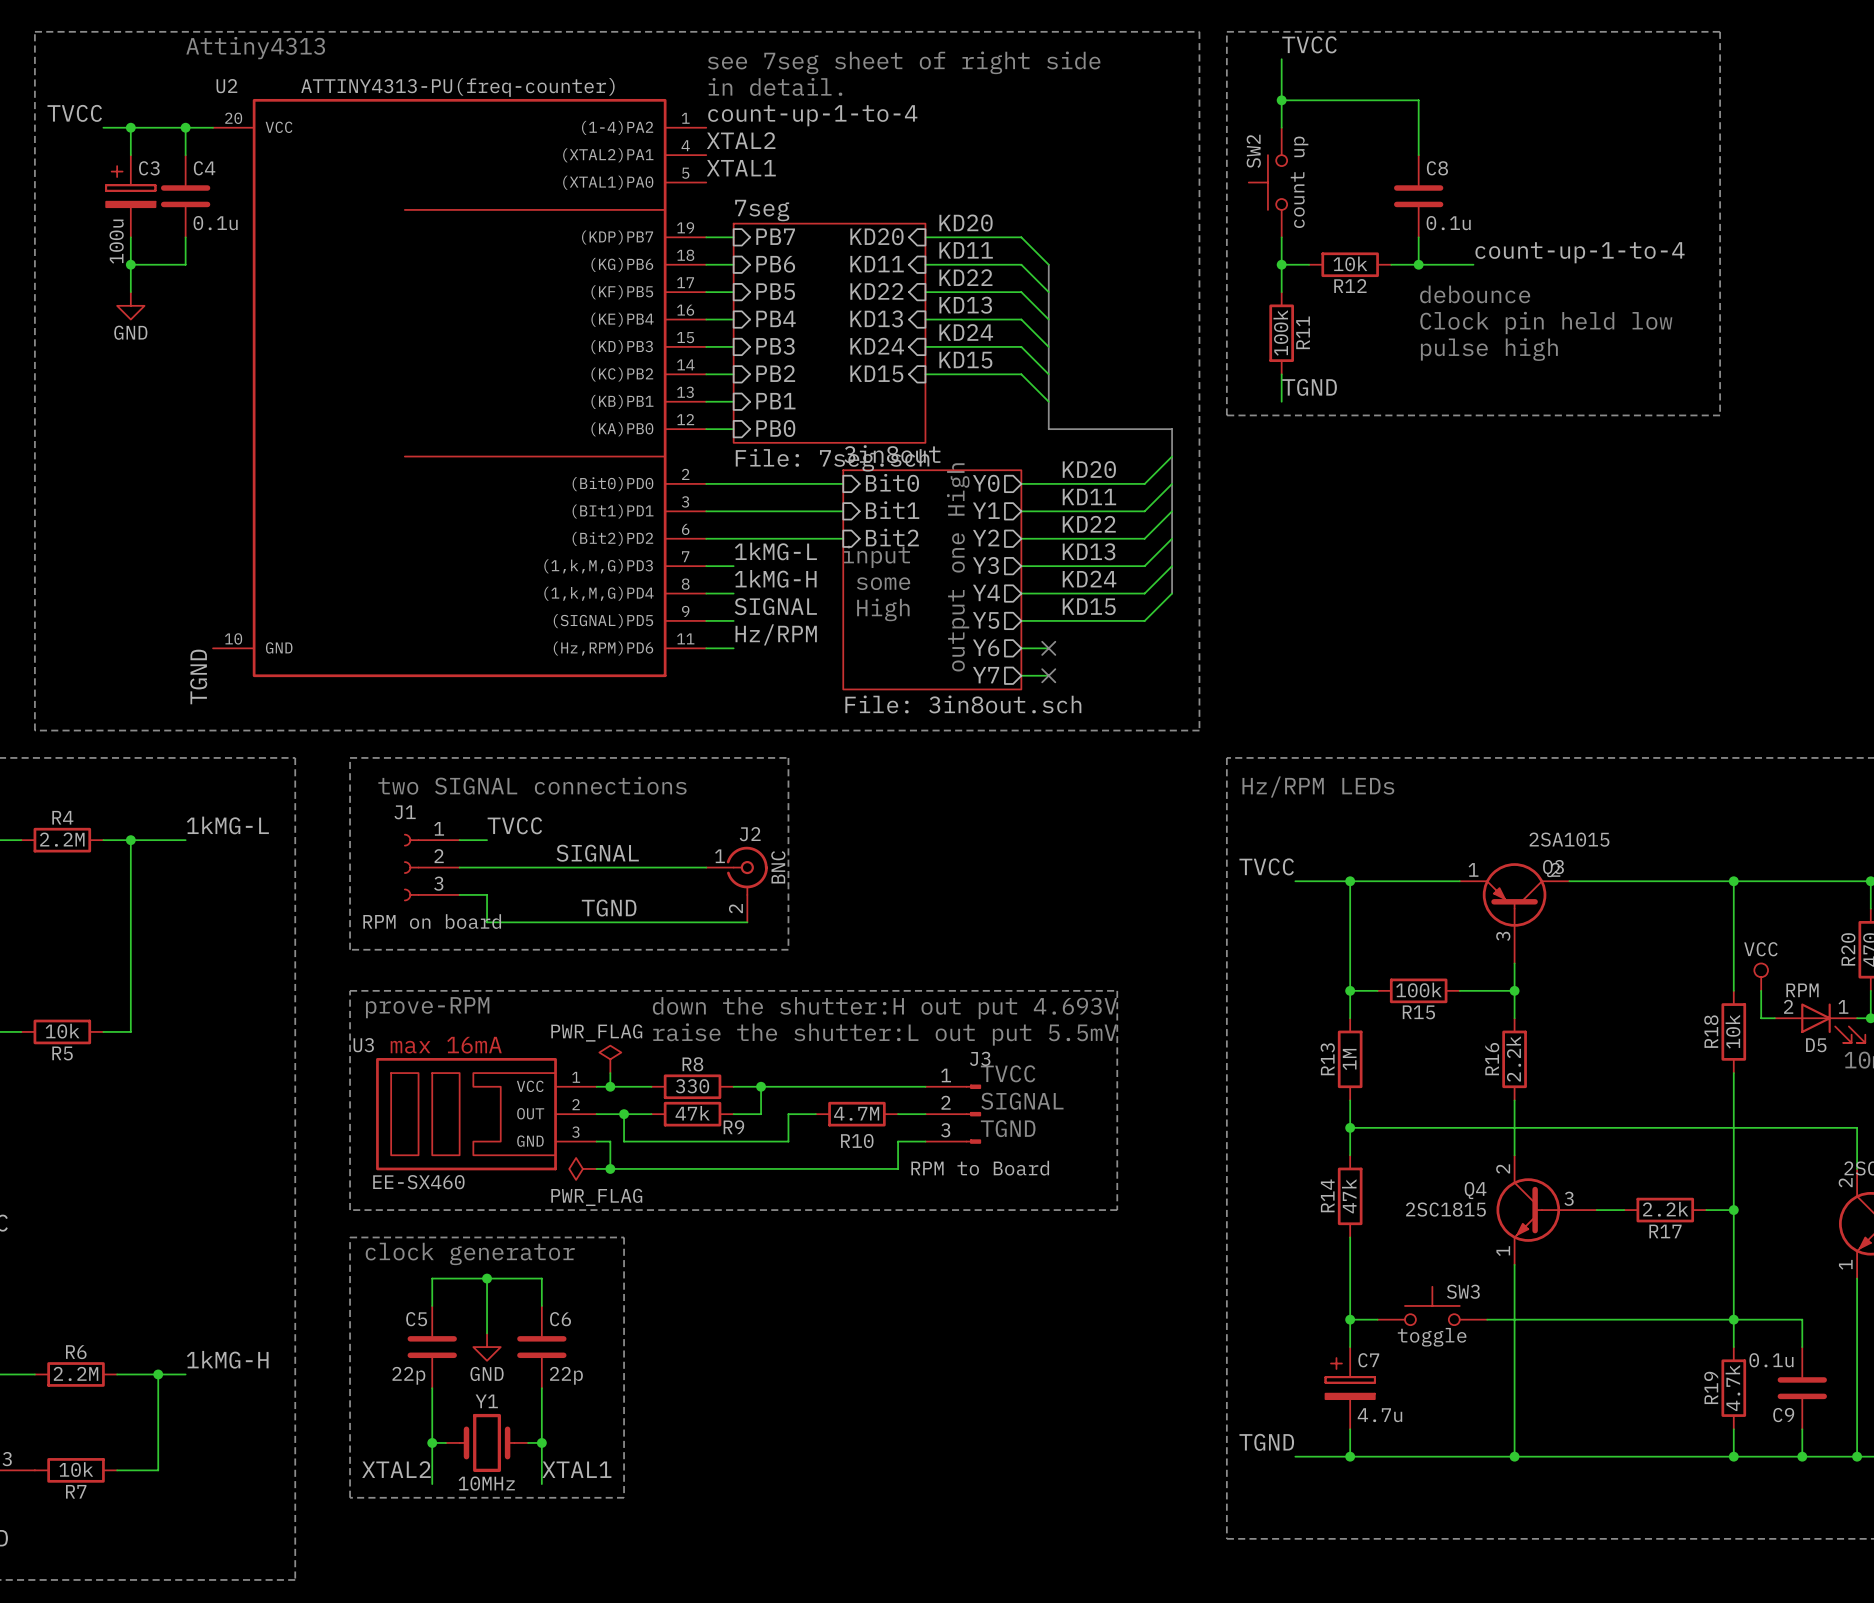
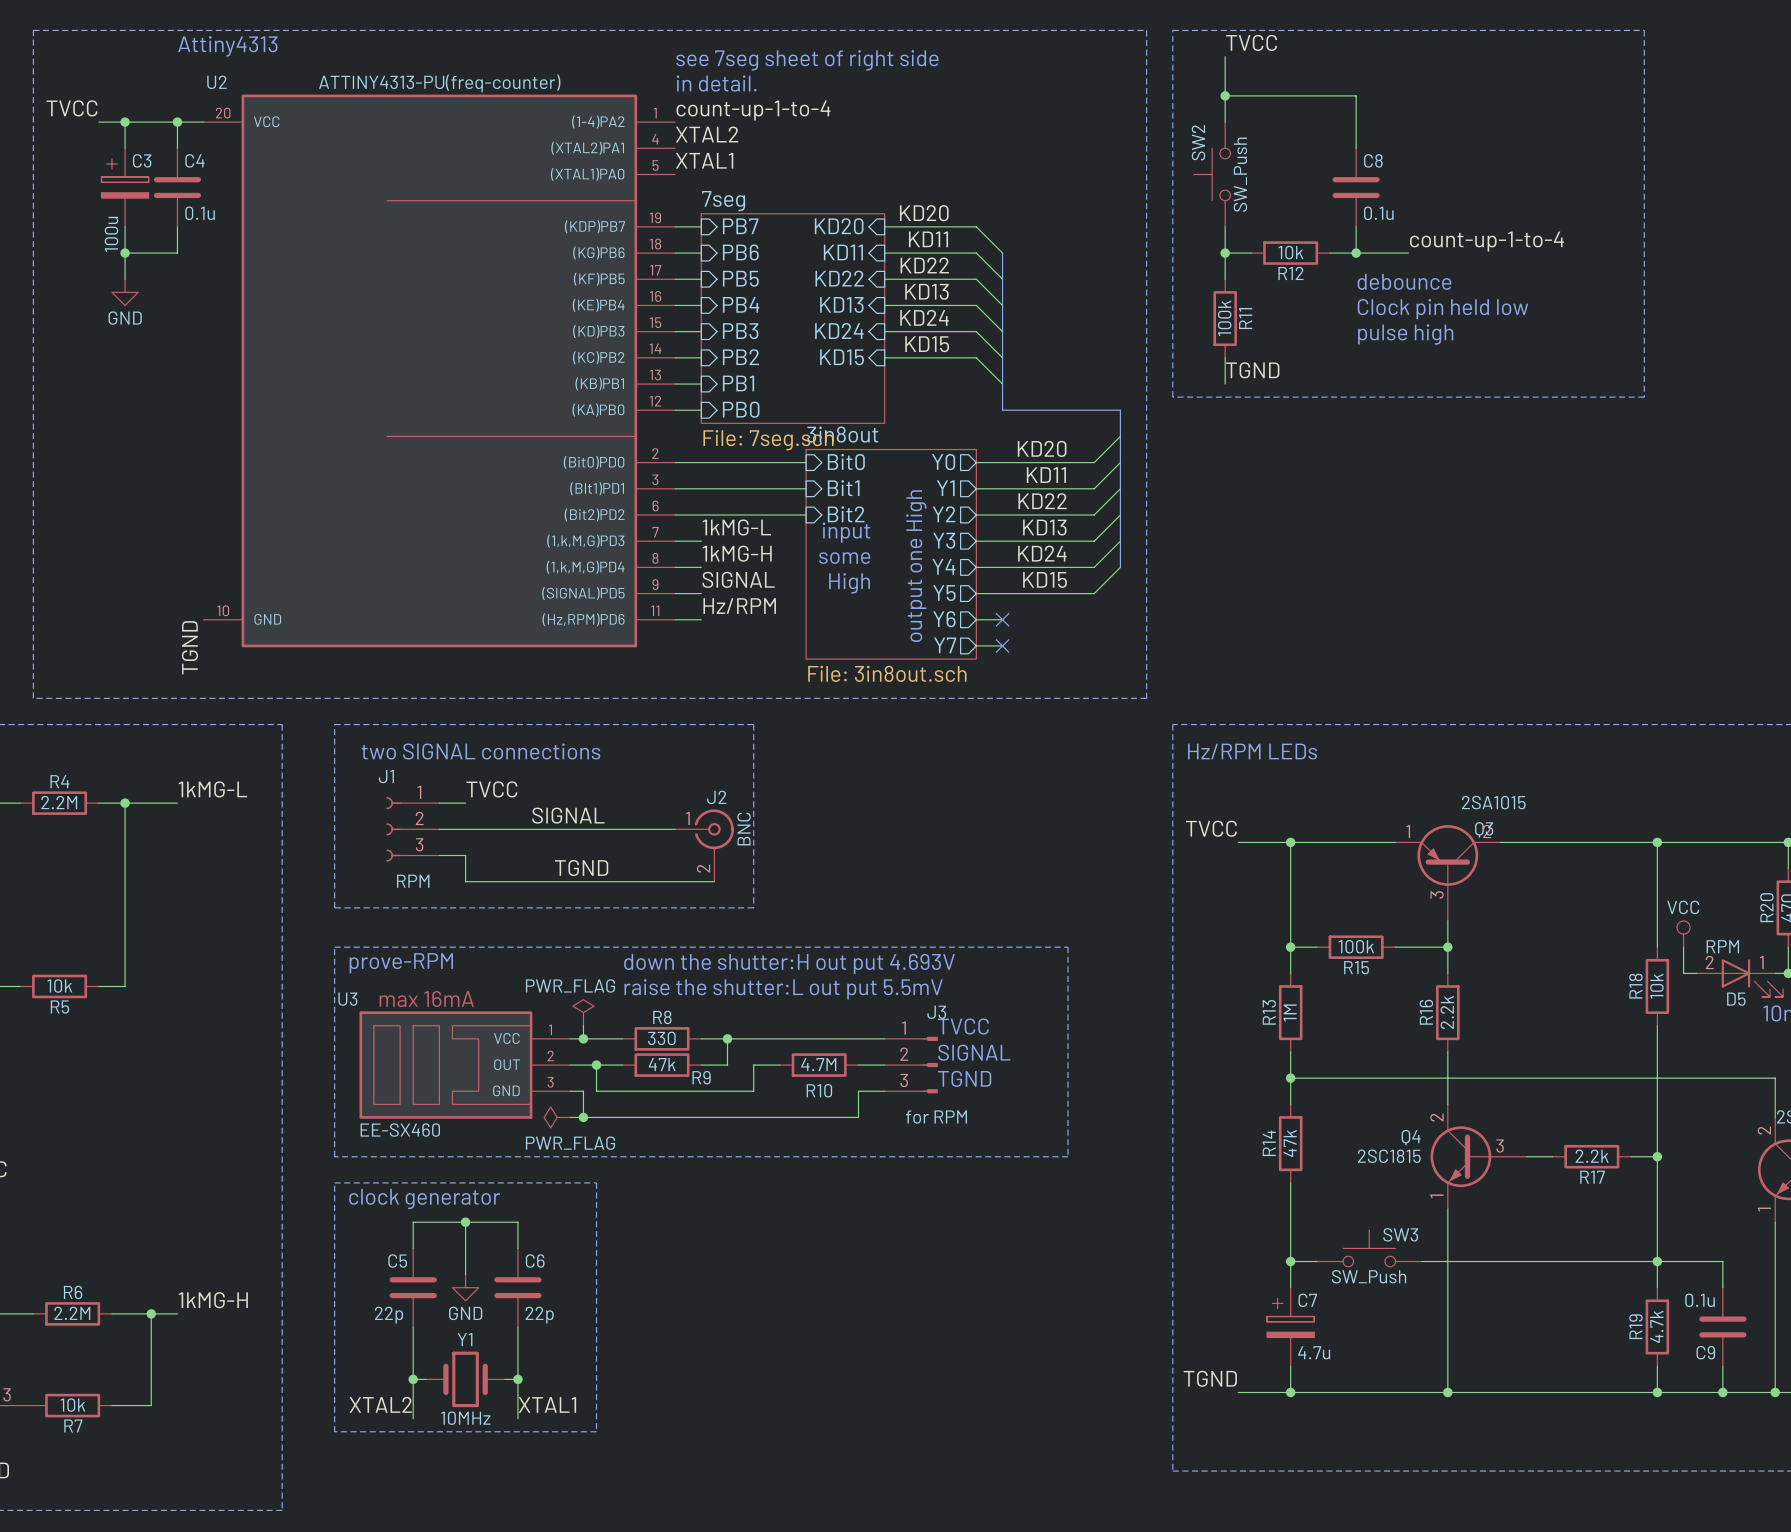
SW2 value: count up (1299, 182) -> SW_Push (1240, 174)
J1 value: RPM on board (432, 921) -> RPM (413, 881)
J3 value: RPM to Board (980, 1168) -> for RPM (936, 1117)
SW3 value: toggle (1432, 1337) -> SW_Push (1369, 1276)

